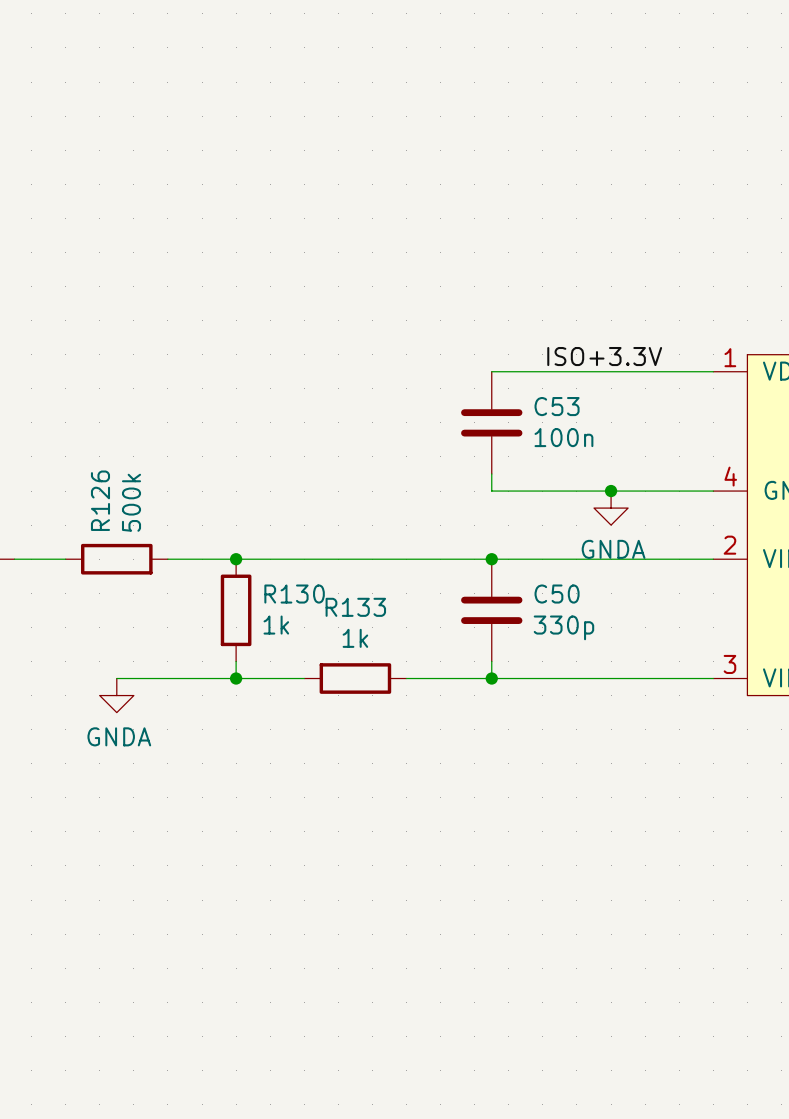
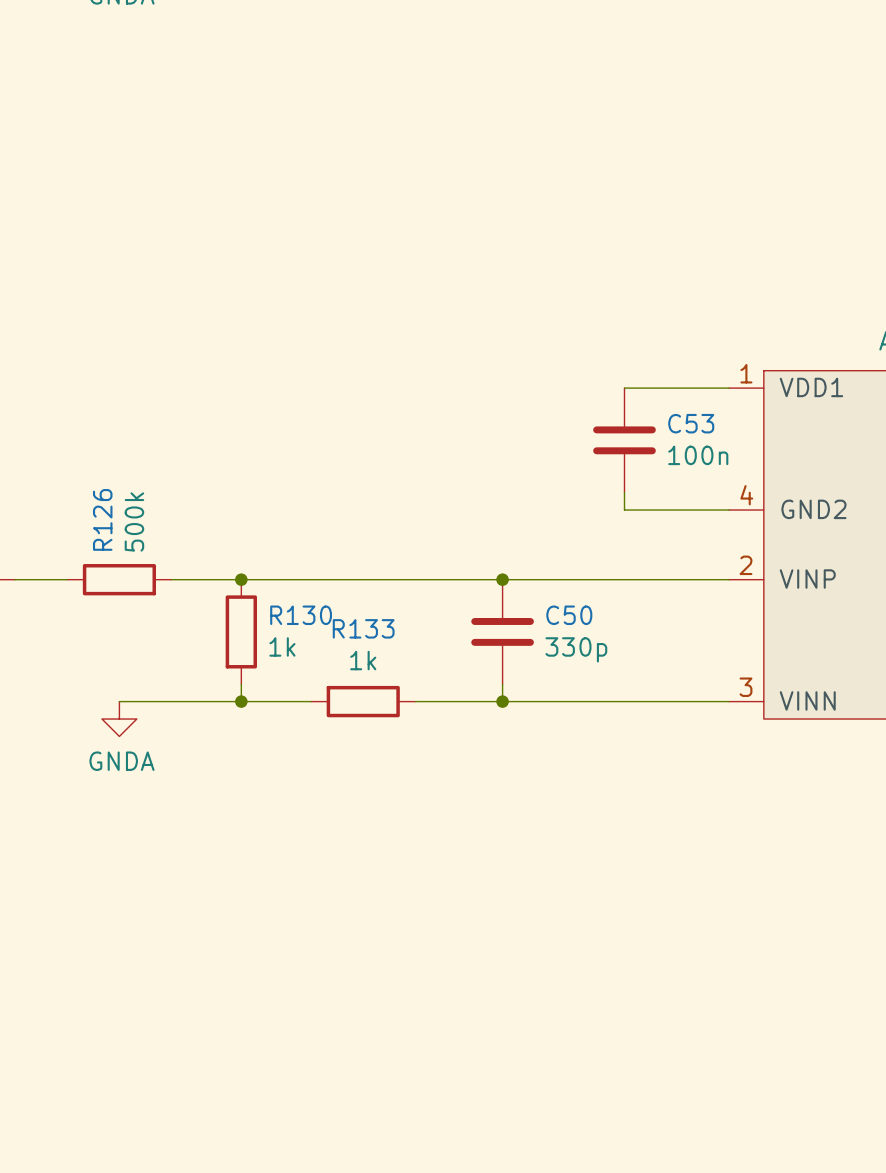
label: ISO+3.3V (604, 356) -> none
wire: (491, 371) (611, 371) -> none
C53 position: (491, 422) -> (624, 440)
wire: (491, 473) (491, 491) (611, 491) -> (624, 492) (624, 510)
junction: (611, 491) -> none
power symbol: GNDA (611, 508) -> none

